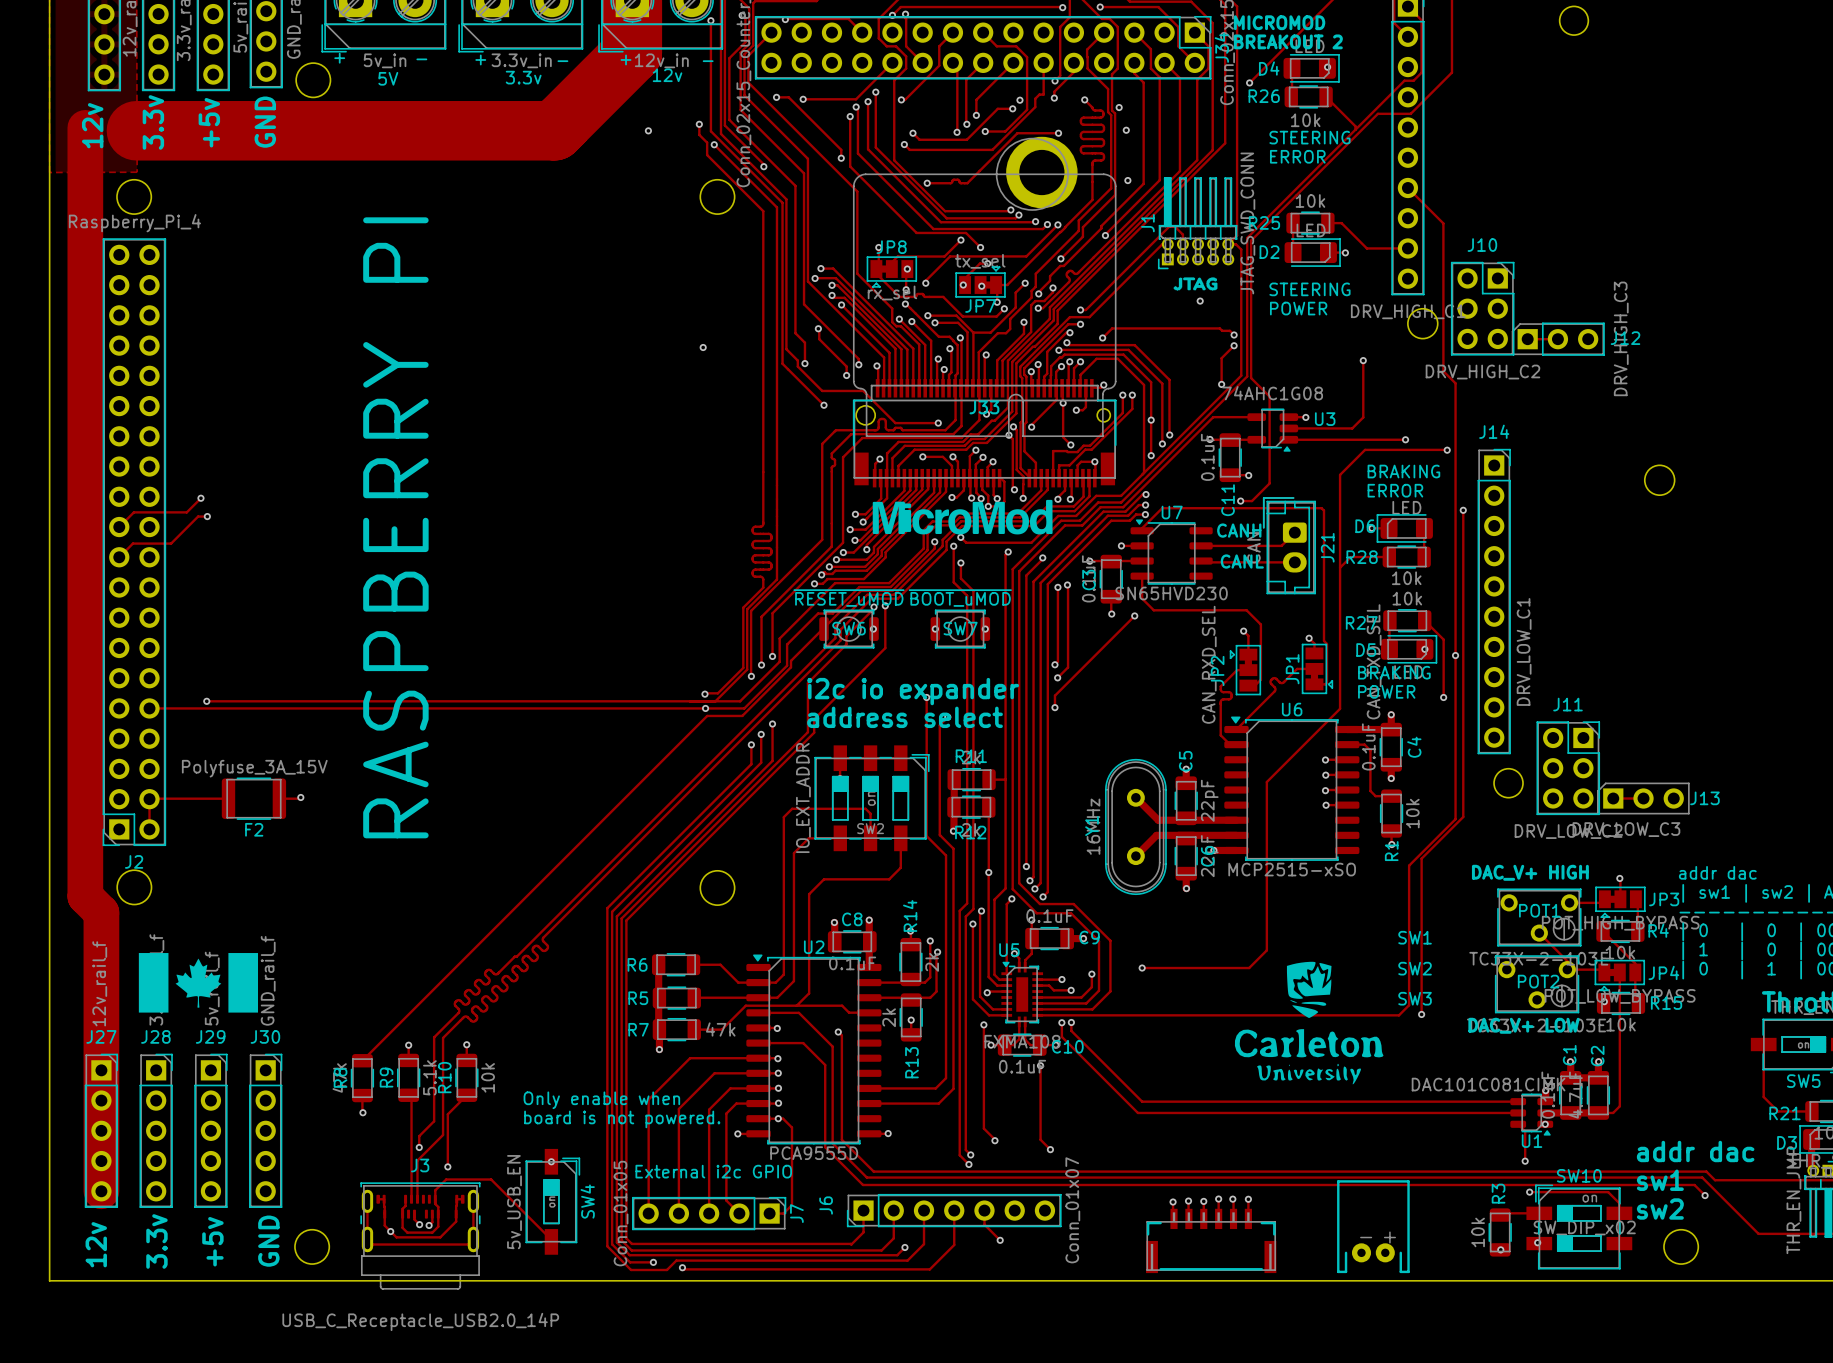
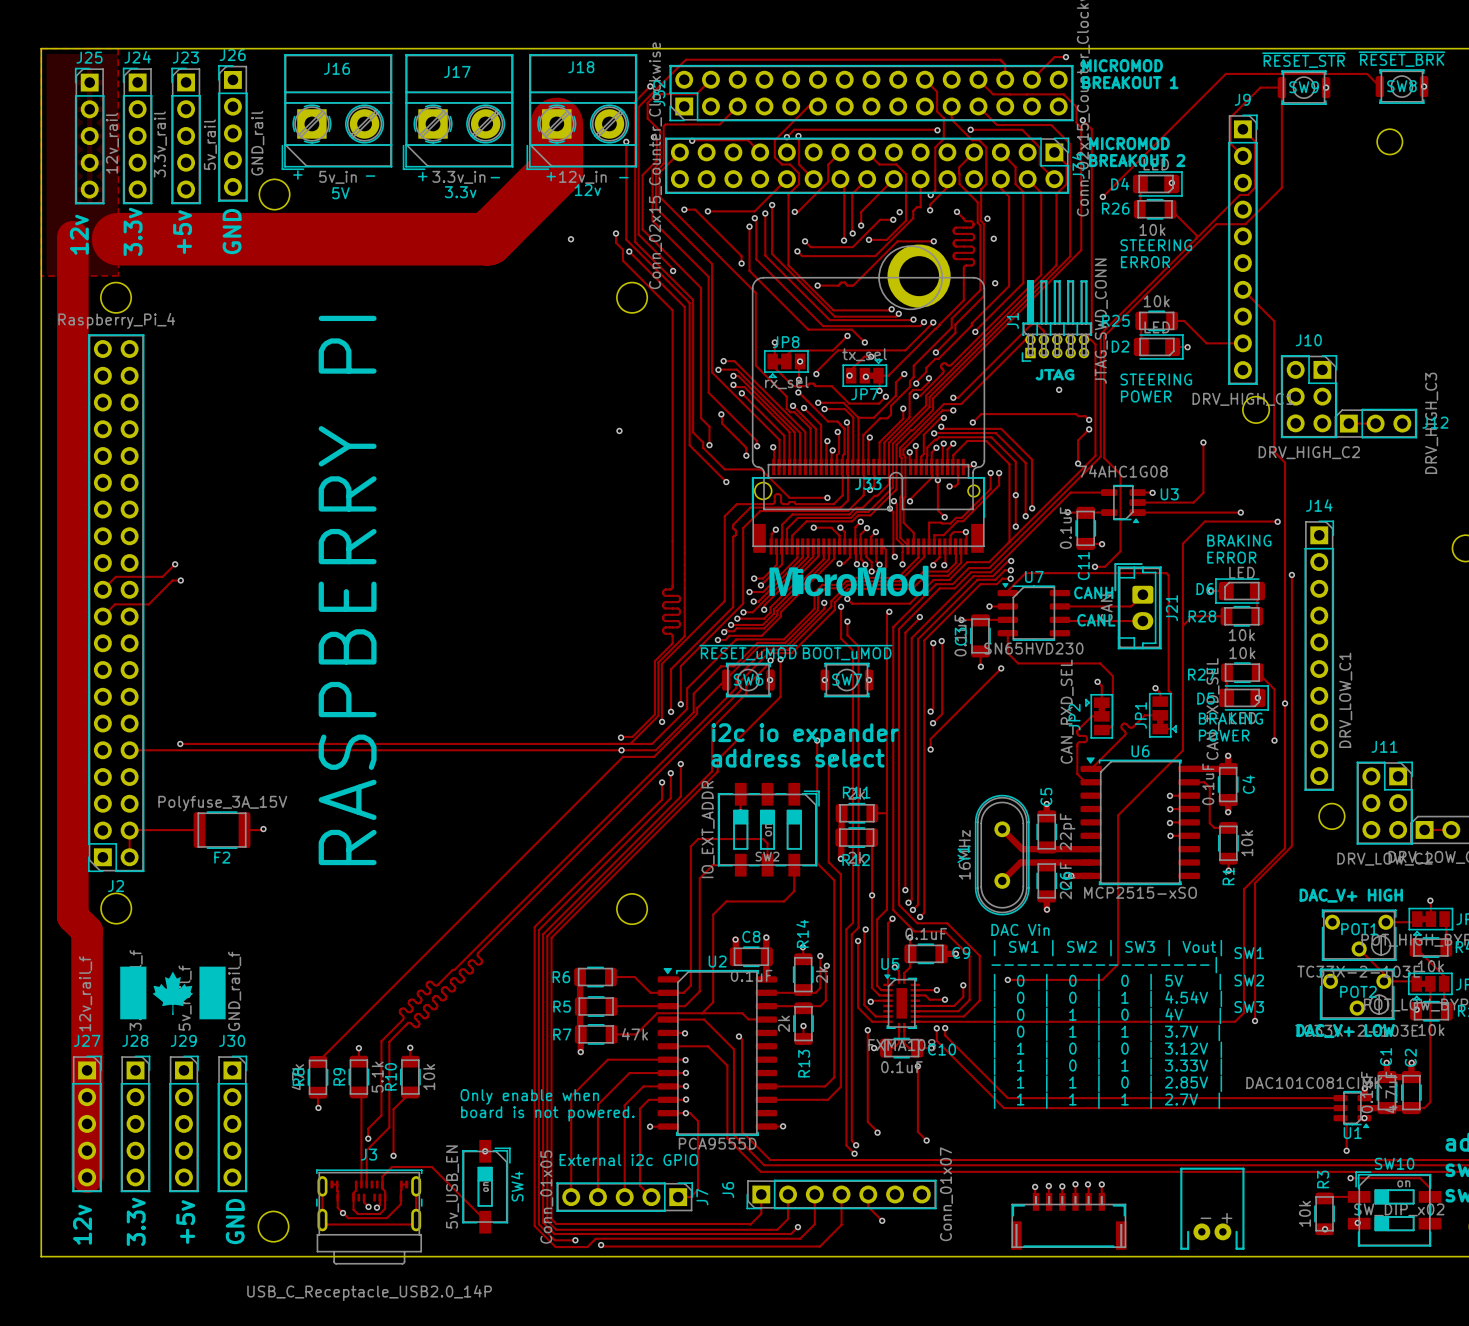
text: none -> DAC Vin (1020, 929)
text: none -> | SW1 | SW2 | SW3 | Vout| (1107, 948)
text: none -> -----------------| (1104, 965)
drawing: [1234, 961, 1384, 1085] -> none
text: none -> | 0 | 0 | 0 | 5V | (1107, 982)
text: none -> | 0 | 0 | 1 | 4.54V | (1107, 998)
text: none -> | 0 | 1 | 0 | 4V | (1107, 1015)
text: none -> | 0 | 1 | 1 | 3.7V | (1106, 1032)
text: none -> | 1 | 0 | 0 | 3.12V | (1107, 1049)
text: none -> | 1 | 0 | 1 | 3.33V | (1107, 1066)
text: none -> | 1 | 1 | 0 | 2.85V | (1107, 1083)
text: none -> | 1 | 1 | 1 | 2.7V | (1106, 1100)

